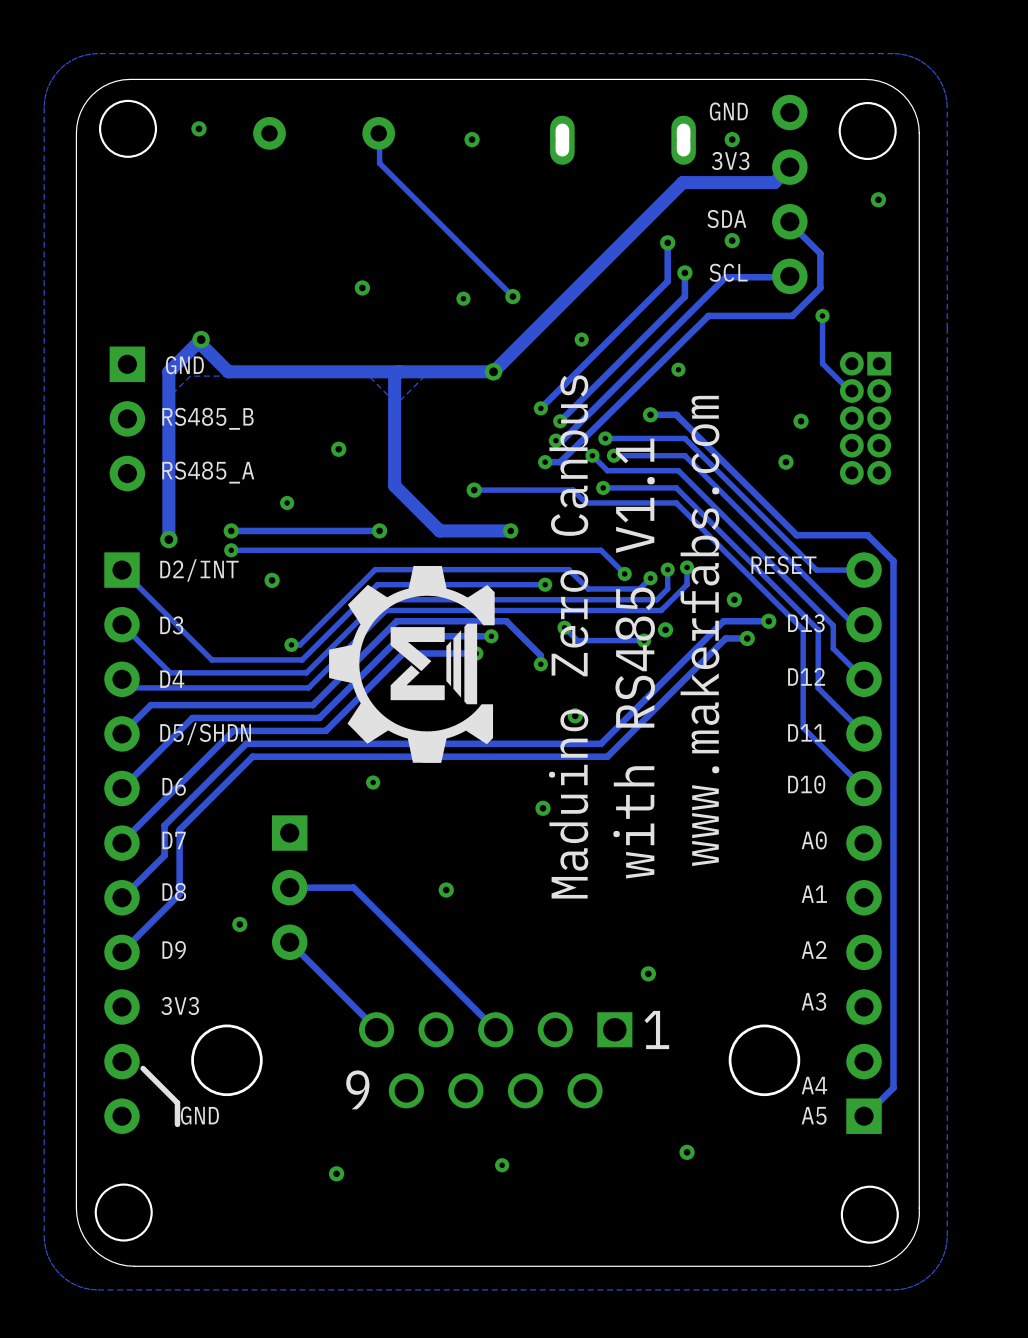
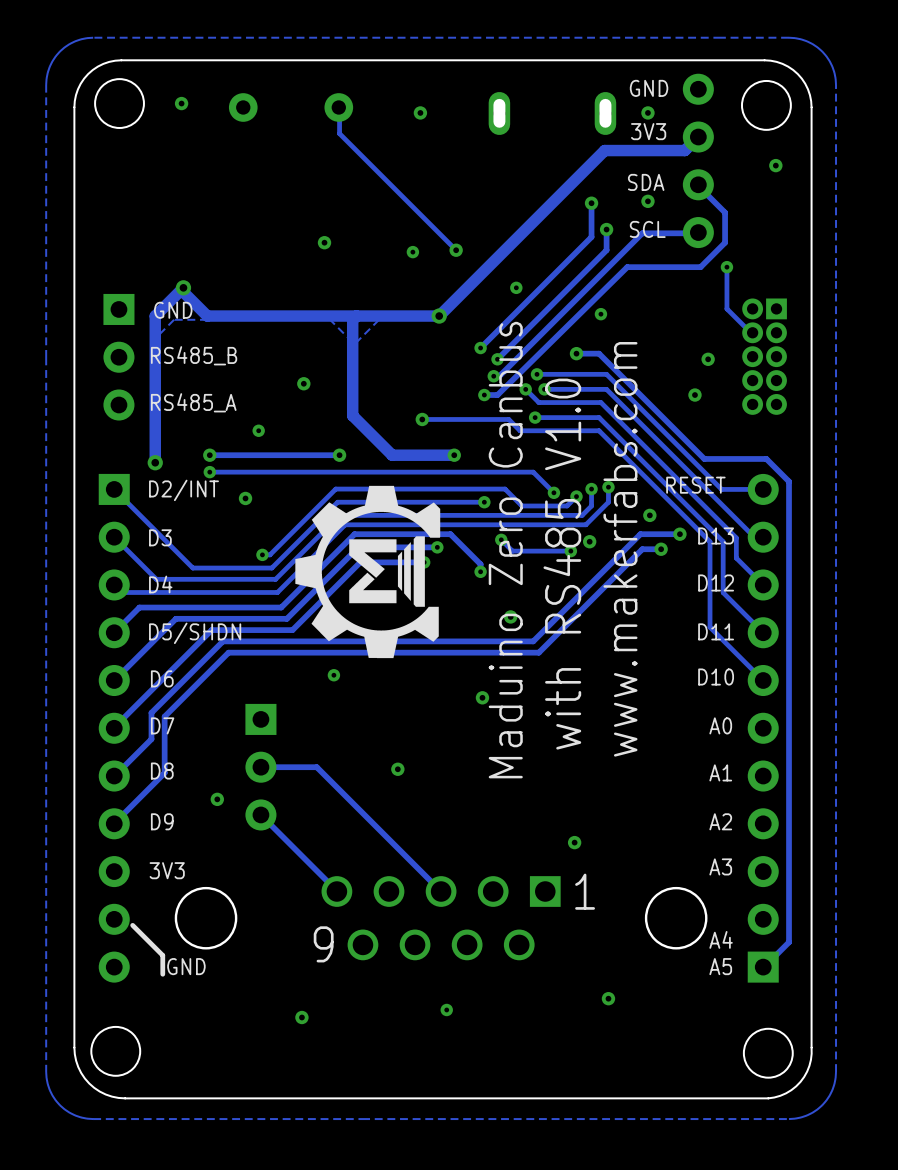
text: with RS485 V1.1 (634, 658) -> with RS485 V1.0 (562, 564)

